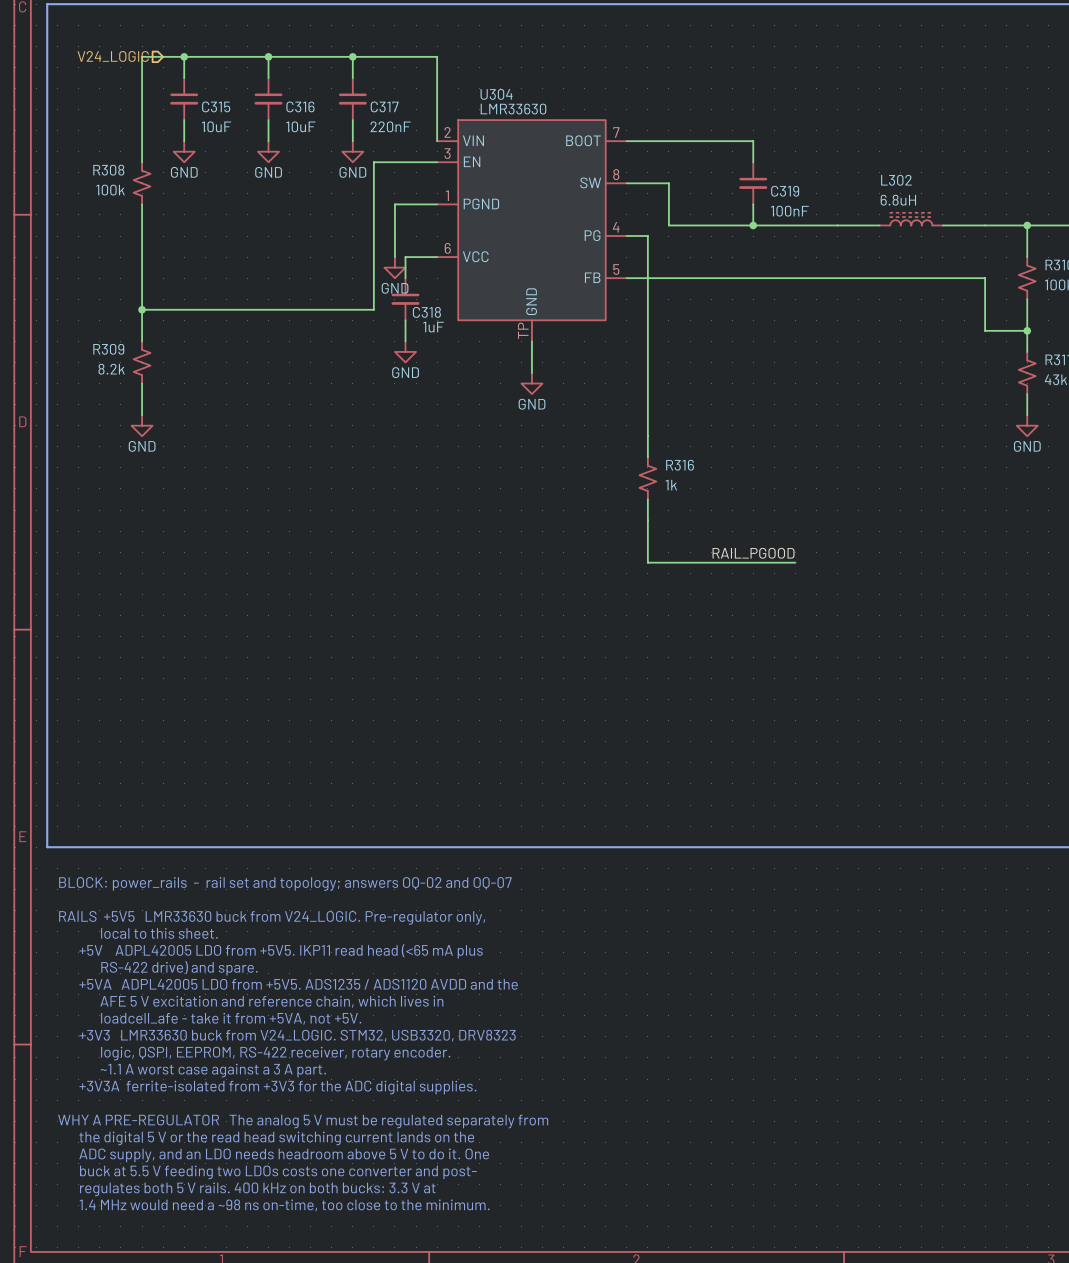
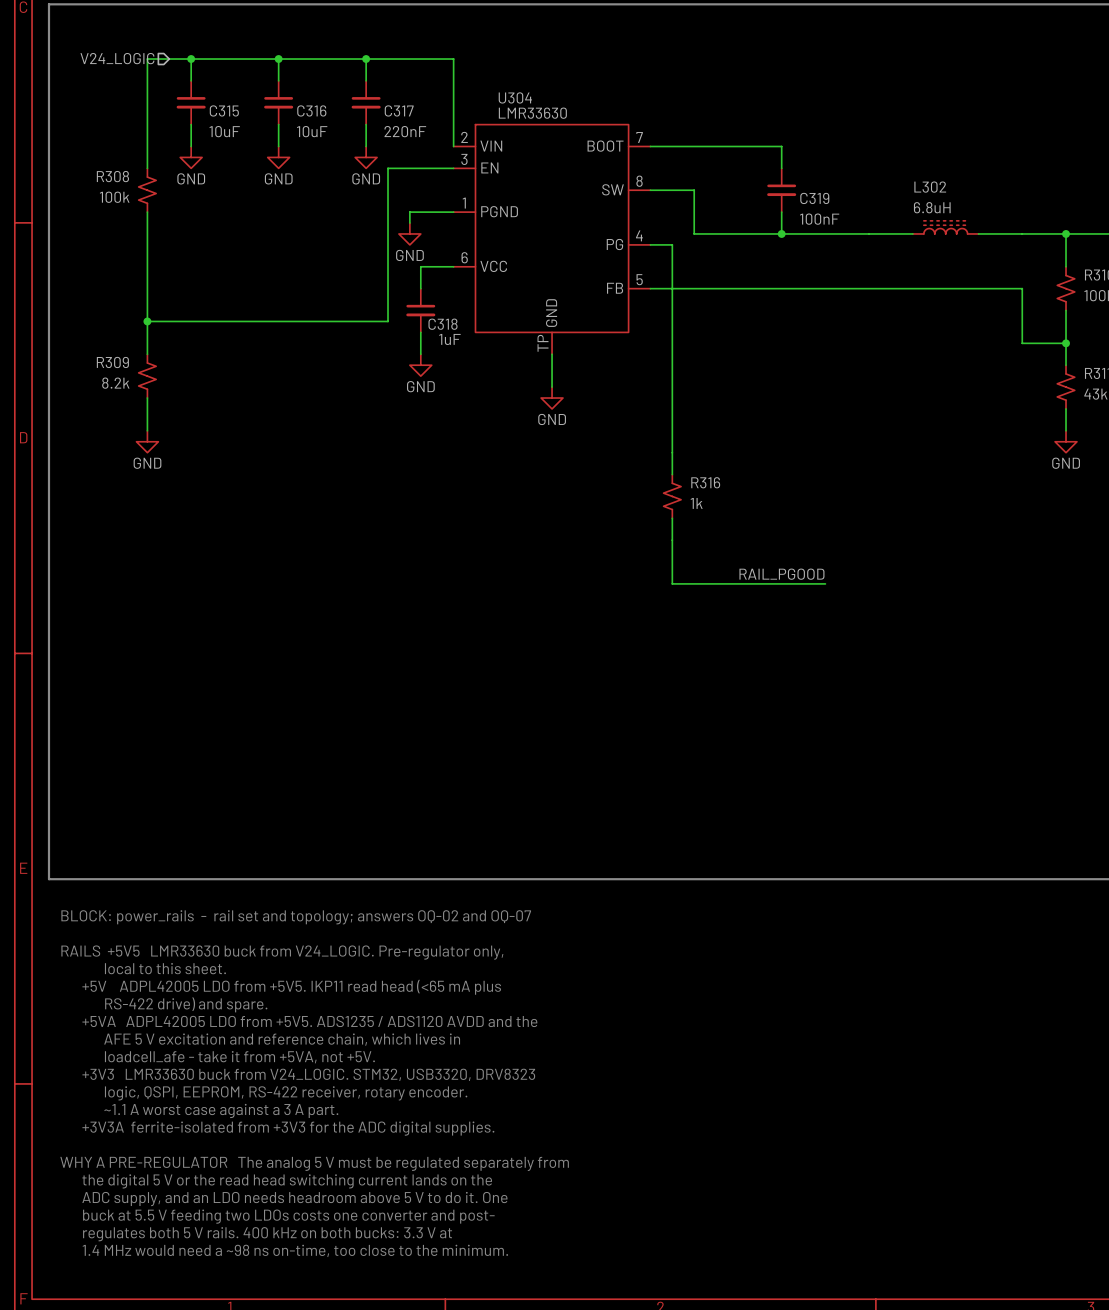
wire: (394, 214) (394, 257) -> none
power symbol position: GND (394, 267) -> GND (409, 233)

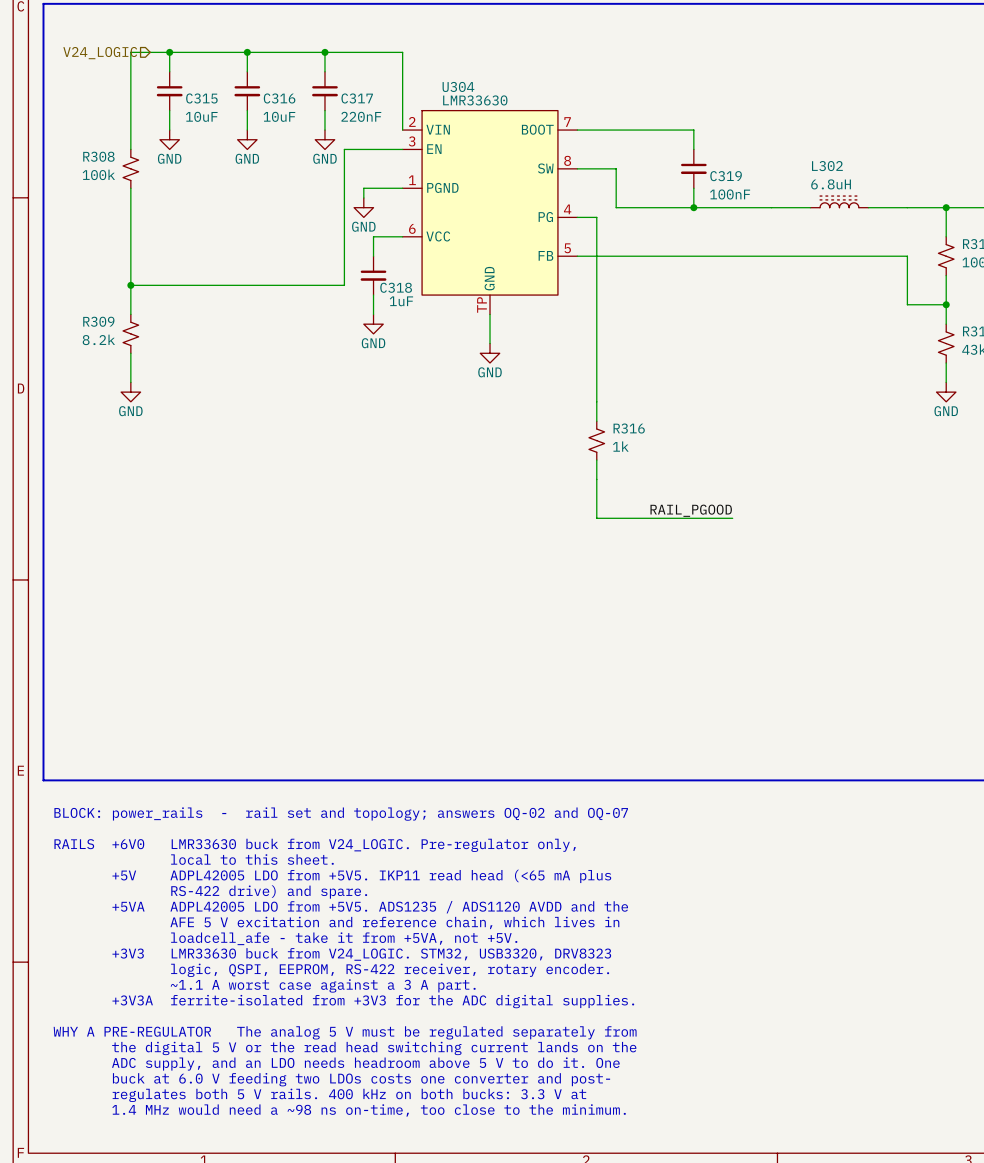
text: RAILS +5V5 LMR33630 buck from V24_LOGIC. Pre-regulator only, (282, 952) -> RAILS +6V0 LMR33630 buck from V24_LOGIC. Pre-regulator only, (315, 845)
text: buck at 5.5 V feeding two LDOs costs one converter and post- (288, 1216) -> buck at 6.0 V feeding two LDOs costs one converter and post- (361, 1079)

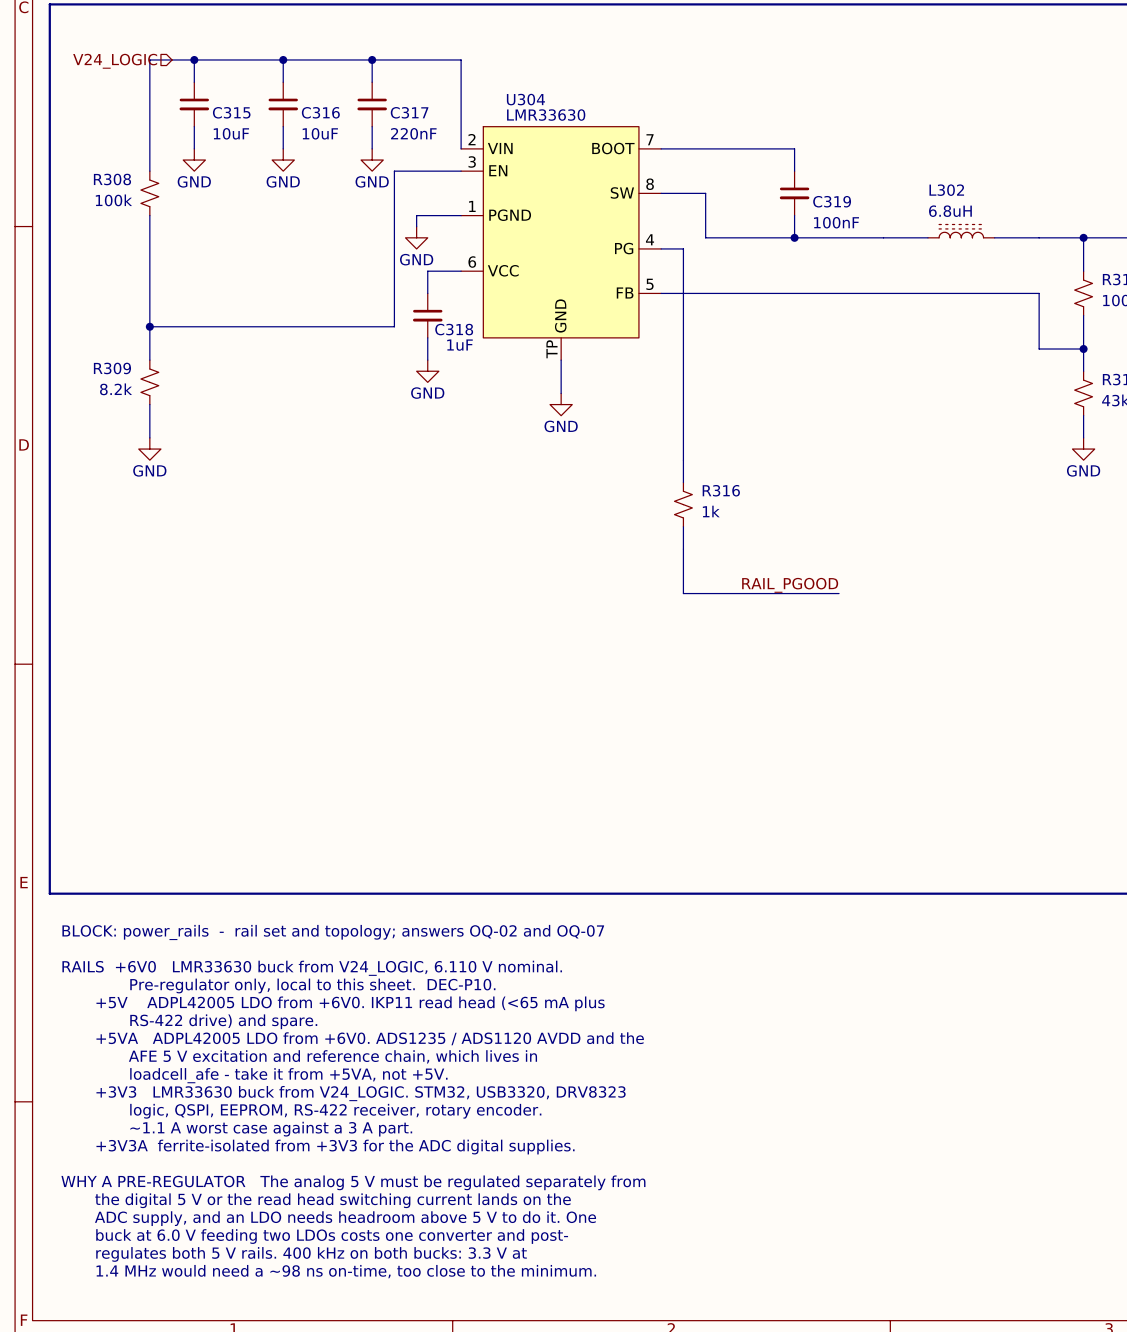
text: RAILS +6V0 LMR33630 buck from V24_LOGIC. Pre-regulator only, (315, 845) -> RAILS +6V0 LMR33630 buck from V24_LOGIC, 6.110 V nominal. (312, 968)
text: local to this sheet. (252, 859) -> Pre-regulator only, local to this sheet. DEC-P10. (312, 985)
text: +5V ADPL42005 LDO from +5V5. IKP11 read head (<65 mA plus (361, 876) -> +5V ADPL42005 LDO from +6V0. IKP11 read head (<65 mA plus (350, 1003)
text: +5VA ADPL42005 LDO from +5V5. ADS1235 / ADS1120 AVDD and the (370, 907) -> +5VA ADPL42005 LDO from +6V0. ADS1235 / ADS1120 AVDD and the (370, 1038)

